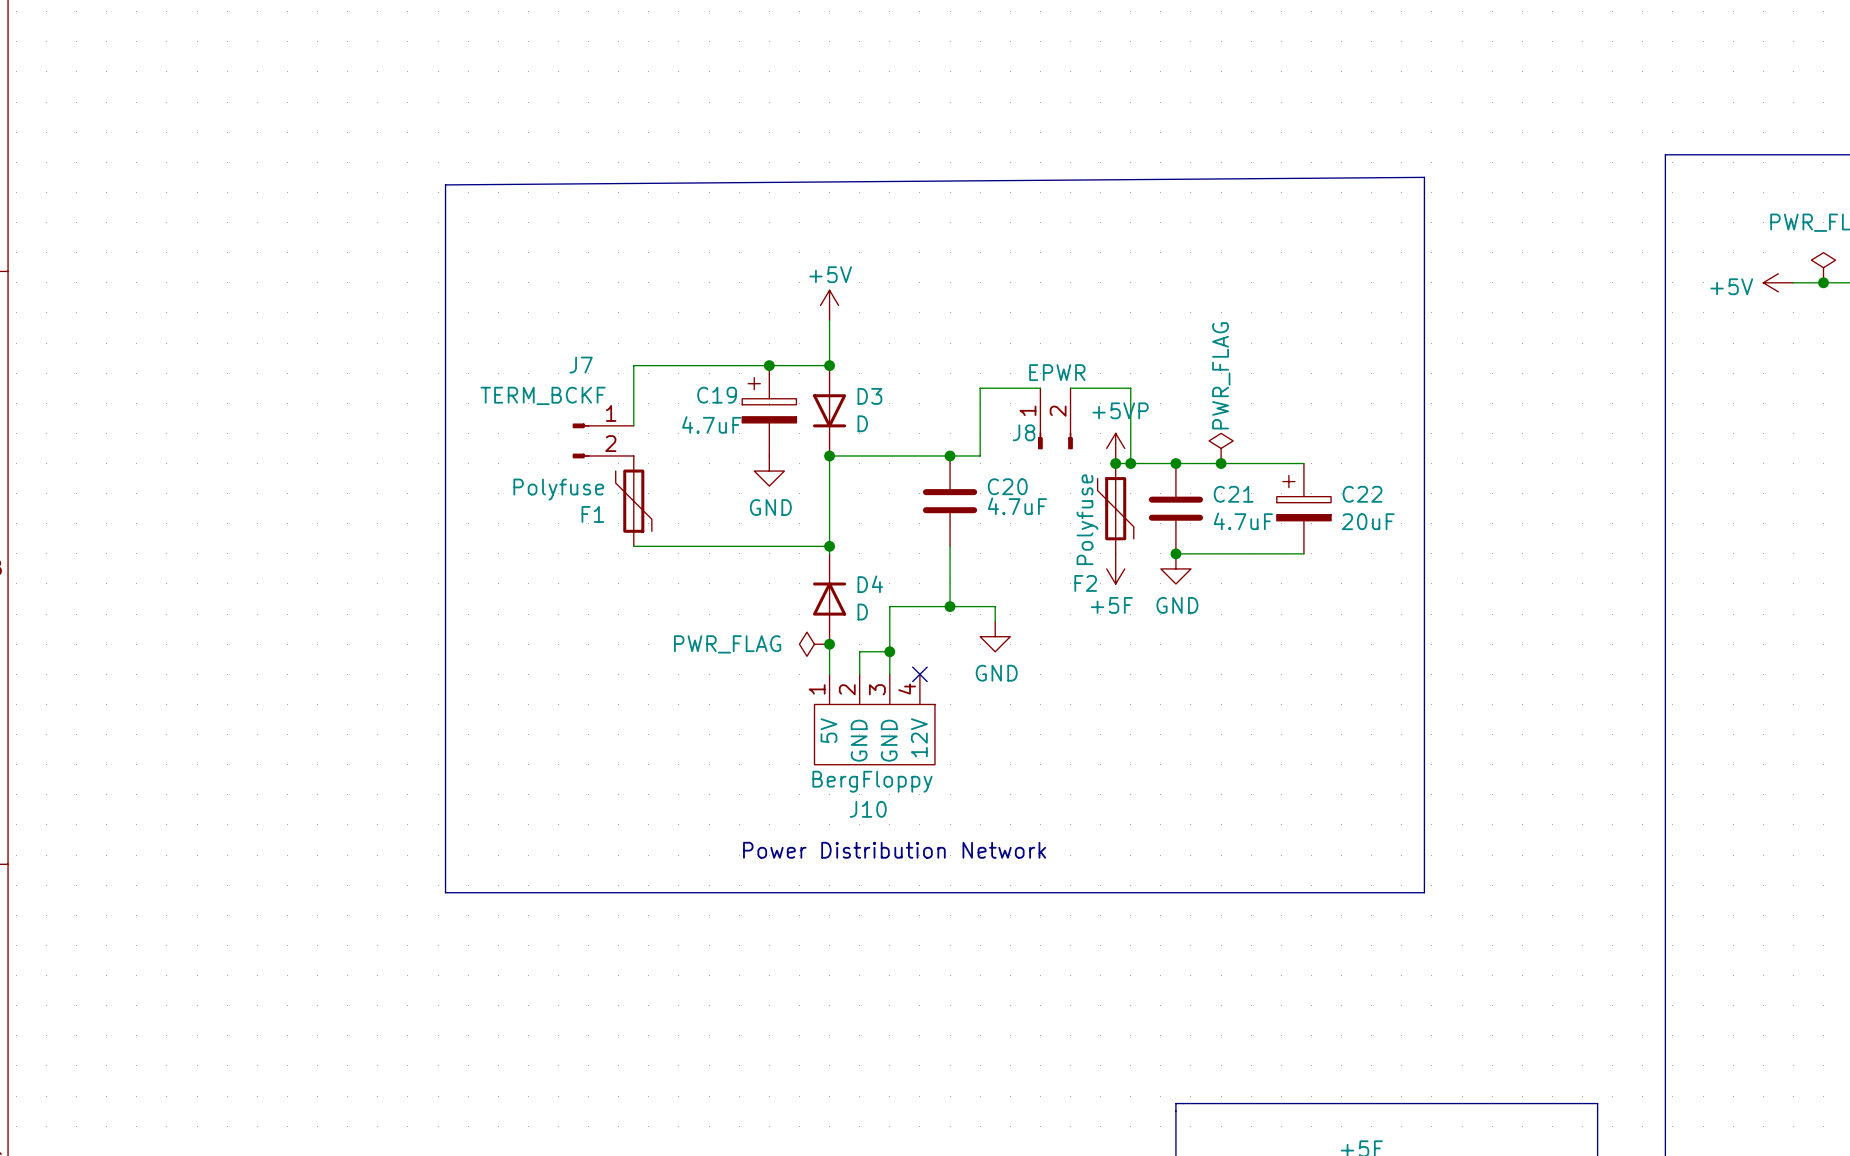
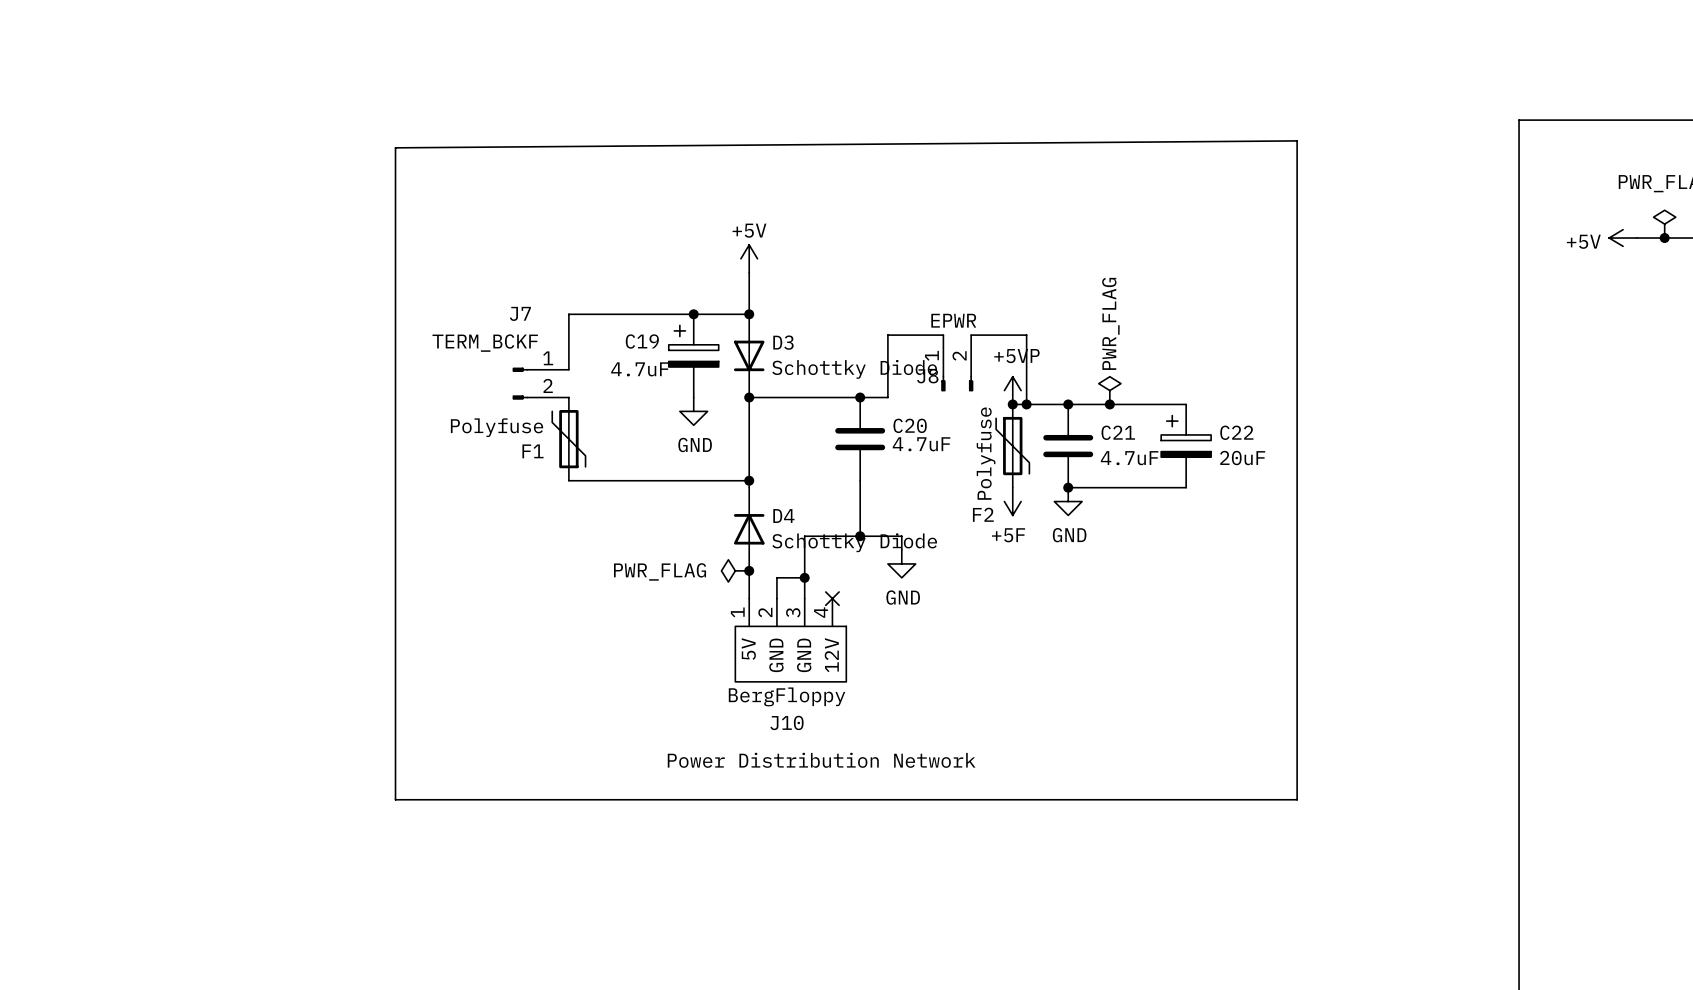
D3 value: D (862, 423) -> Schottky Diode (854, 369)
D4 value: D (862, 612) -> Schottky Diode (854, 542)

